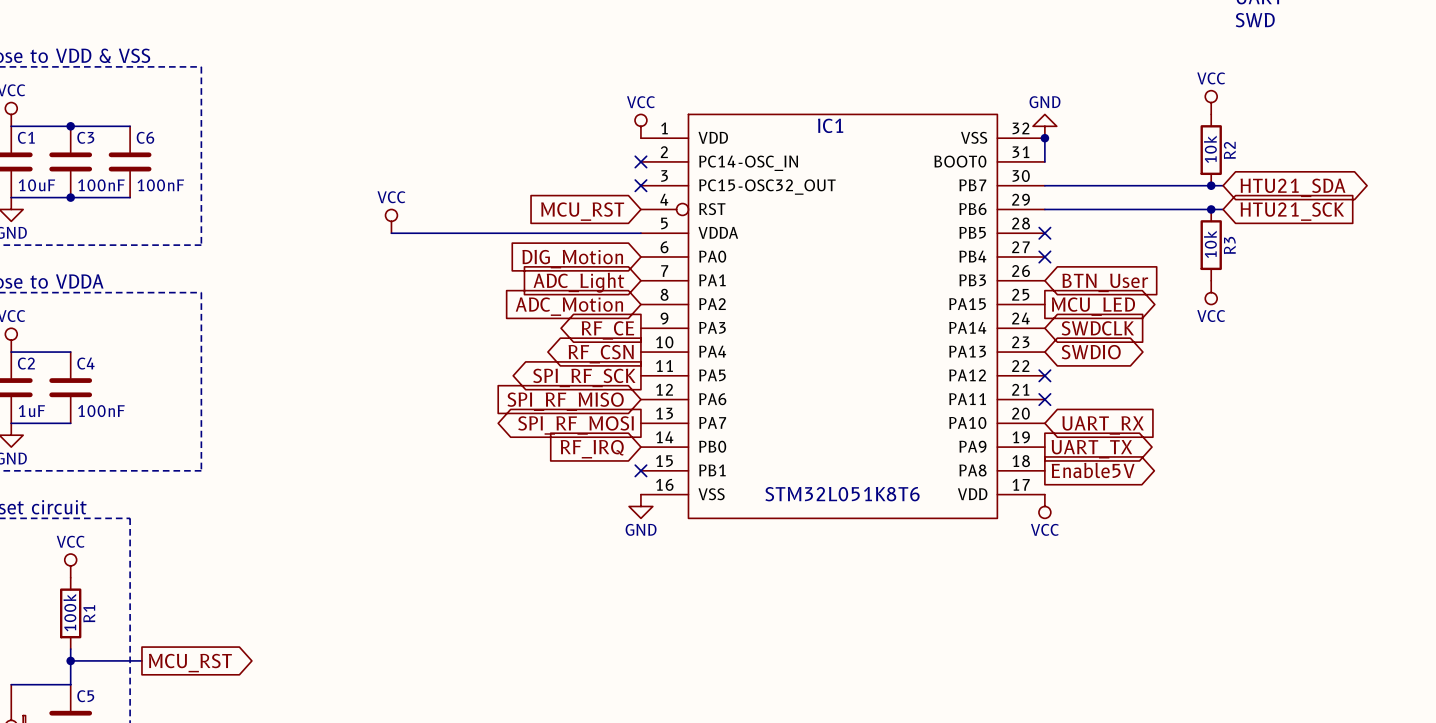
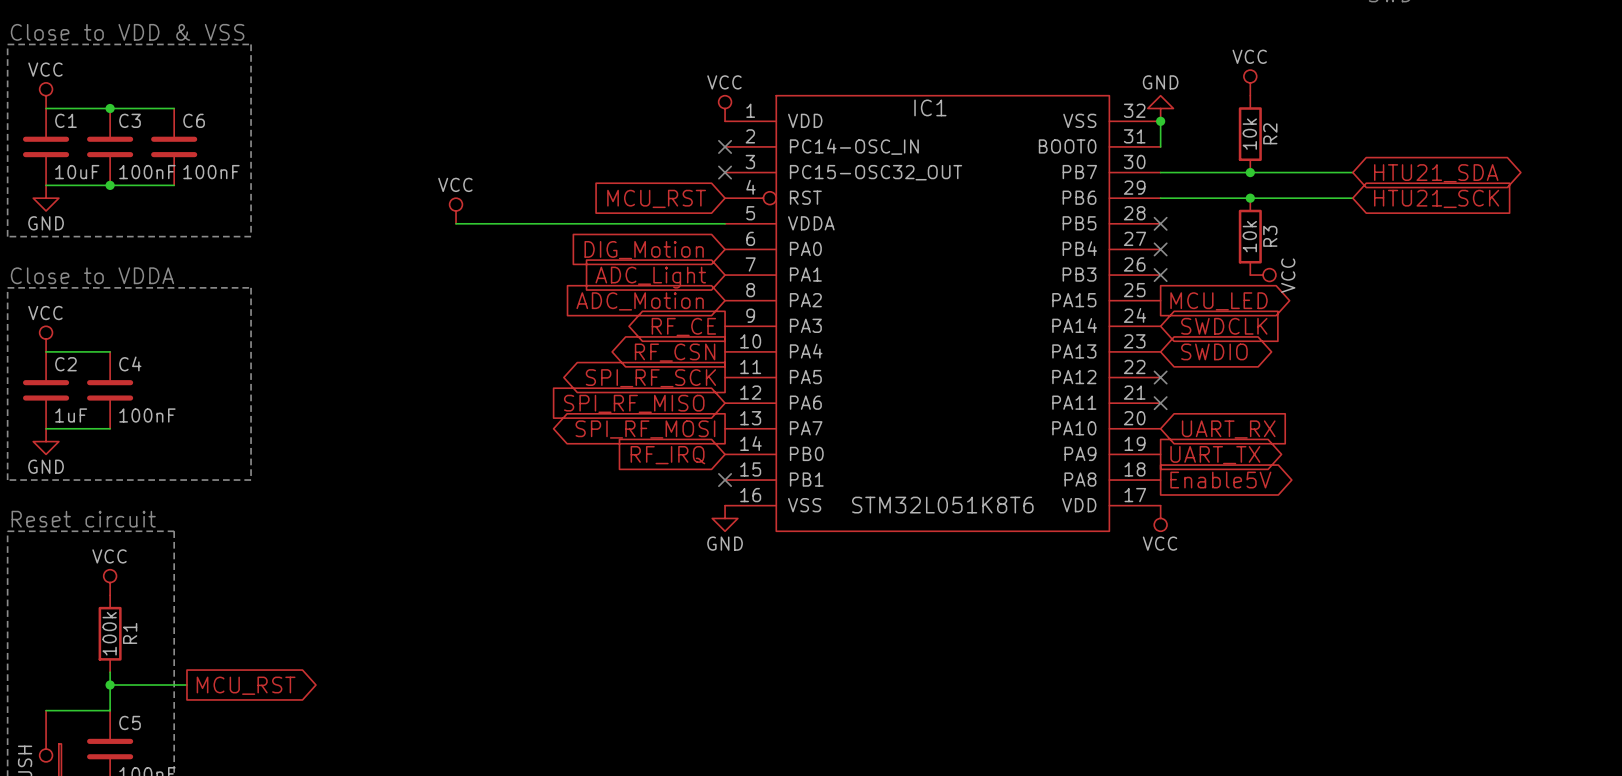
power symbol position: VCC (1211, 102) -> VCC (1250, 82)
R2 position: (1211, 150) -> (1250, 134)
junction: none -> (1250, 172)
junction: (1211, 185) -> none
junction: none -> (1250, 198)
junction: (1211, 209) -> none
R3 position: (1211, 245) -> (1250, 236)
no-connect mark: none -> (1160, 275)
global label: BTN_User (1105, 282) -> none
power symbol rotation: 0° (1211, 292) -> 90° counterclockwise (1263, 275)
power symbol position: VCC (1211, 292) -> VCC (1263, 275)

